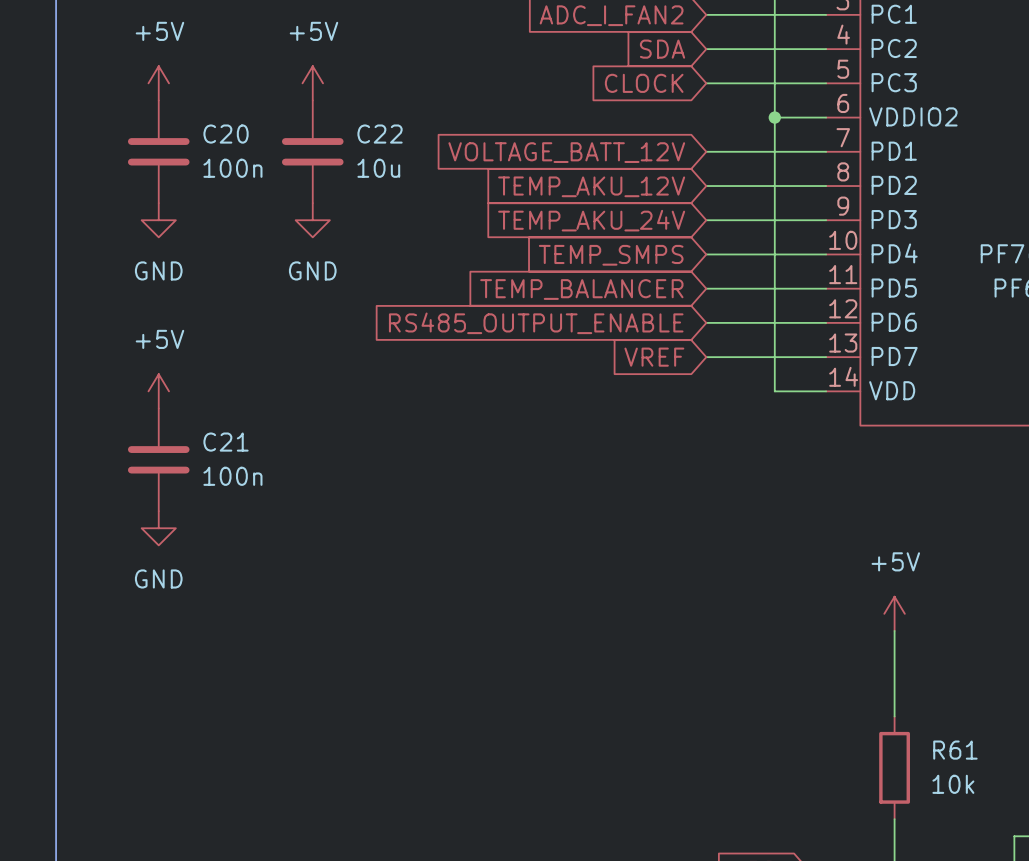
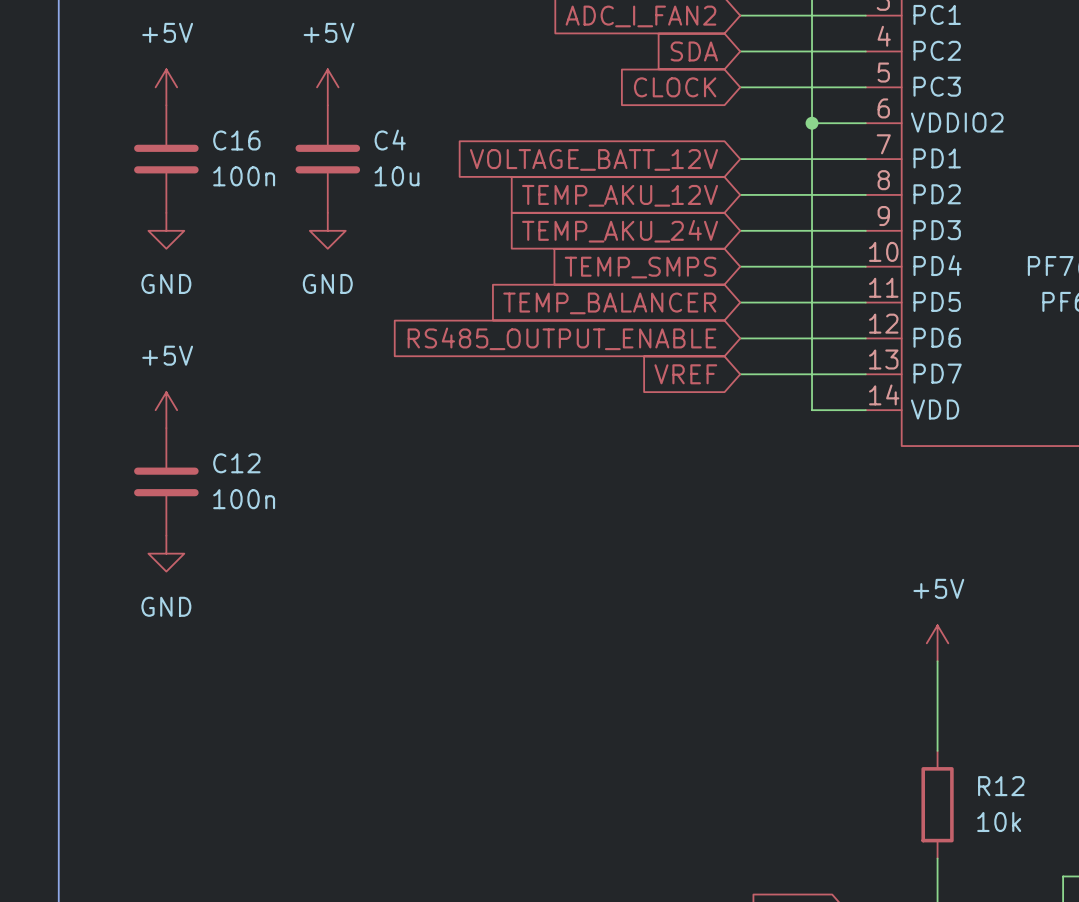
C20 name: C20 (226, 134) -> C16 (236, 140)
C22 name: C22 (380, 134) -> C4 (390, 140)
C21 name: C21 (226, 442) -> C12 (236, 463)
R61 name: R61 (955, 750) -> R12 (1001, 786)

